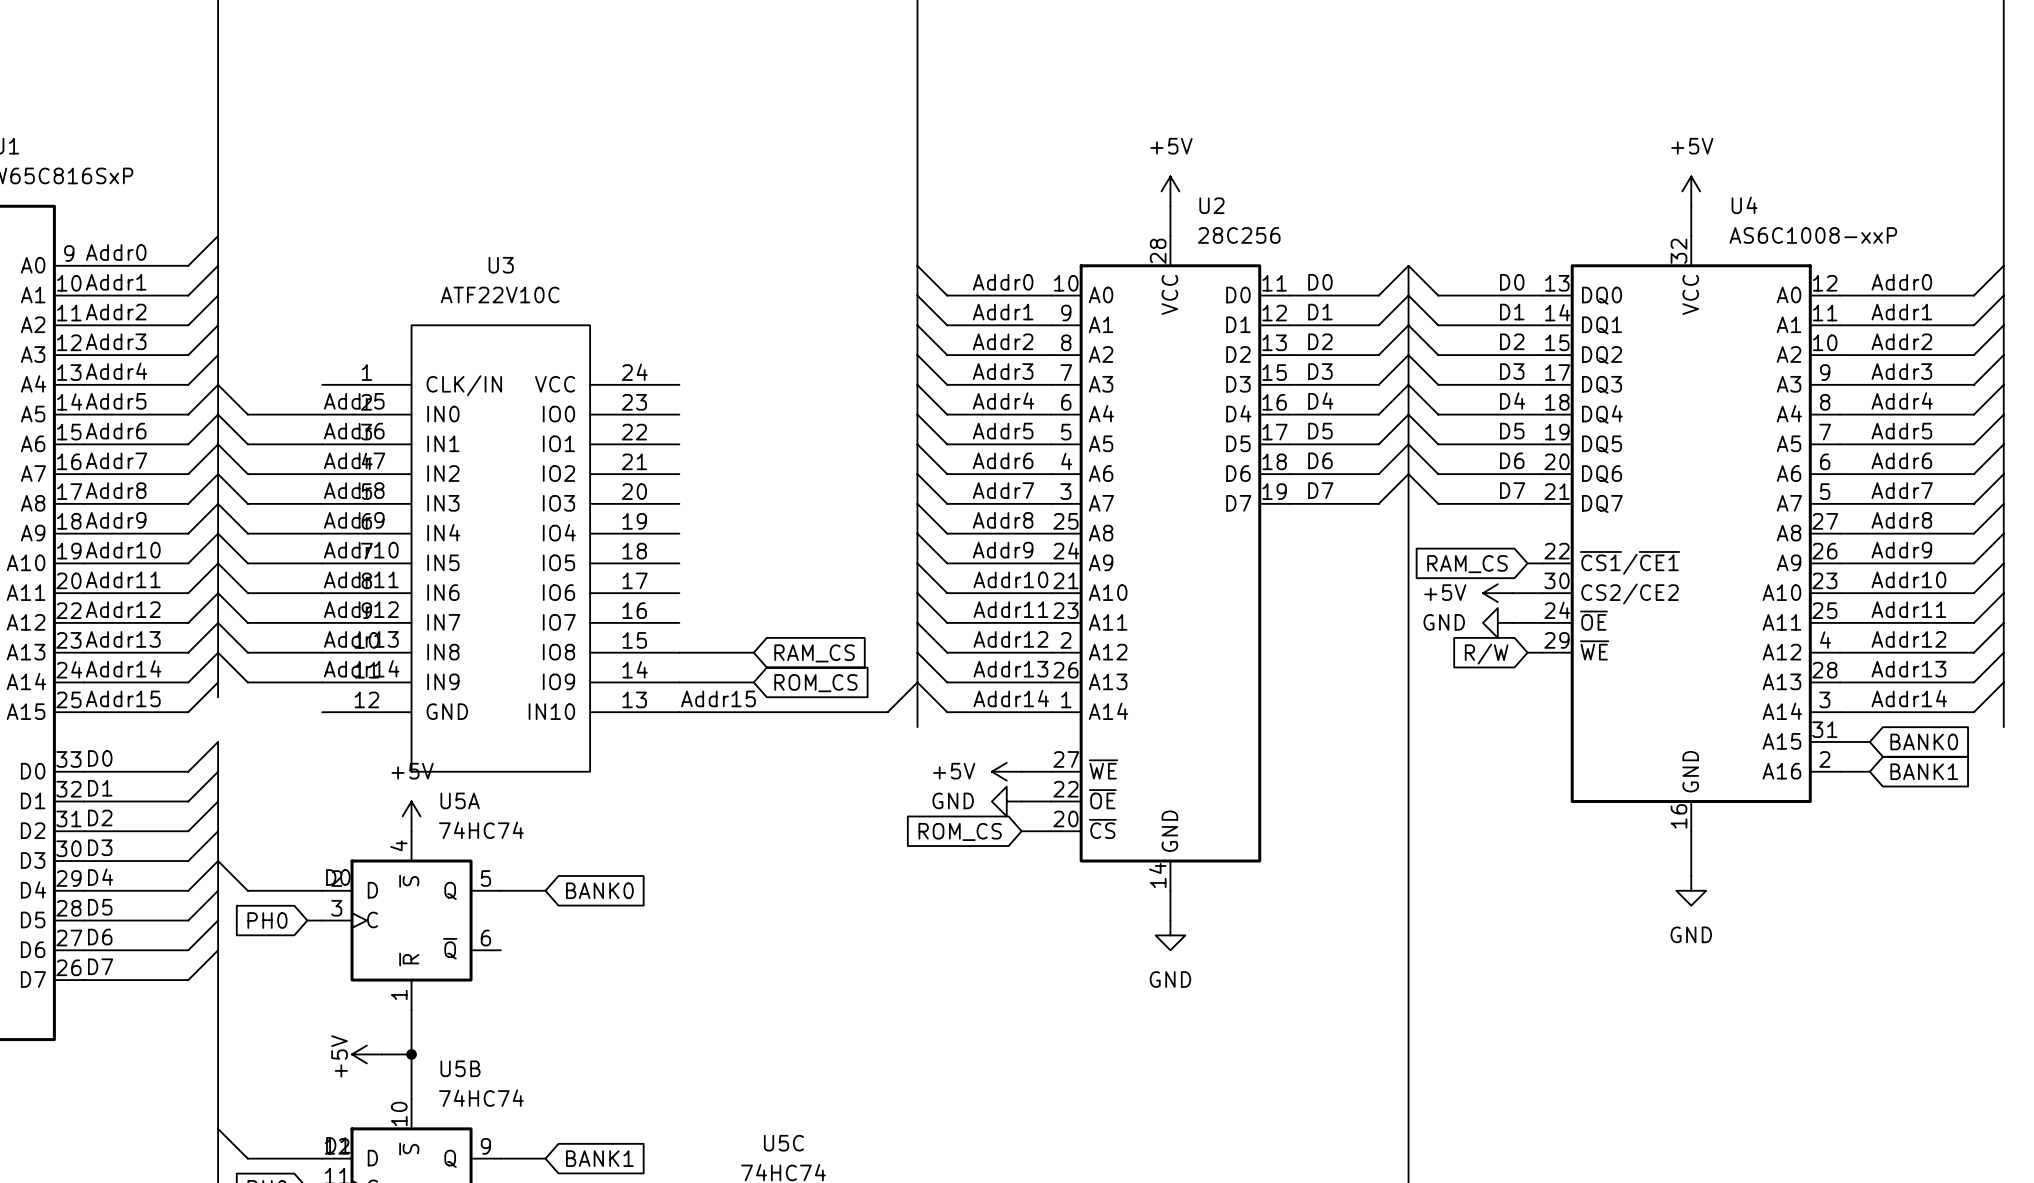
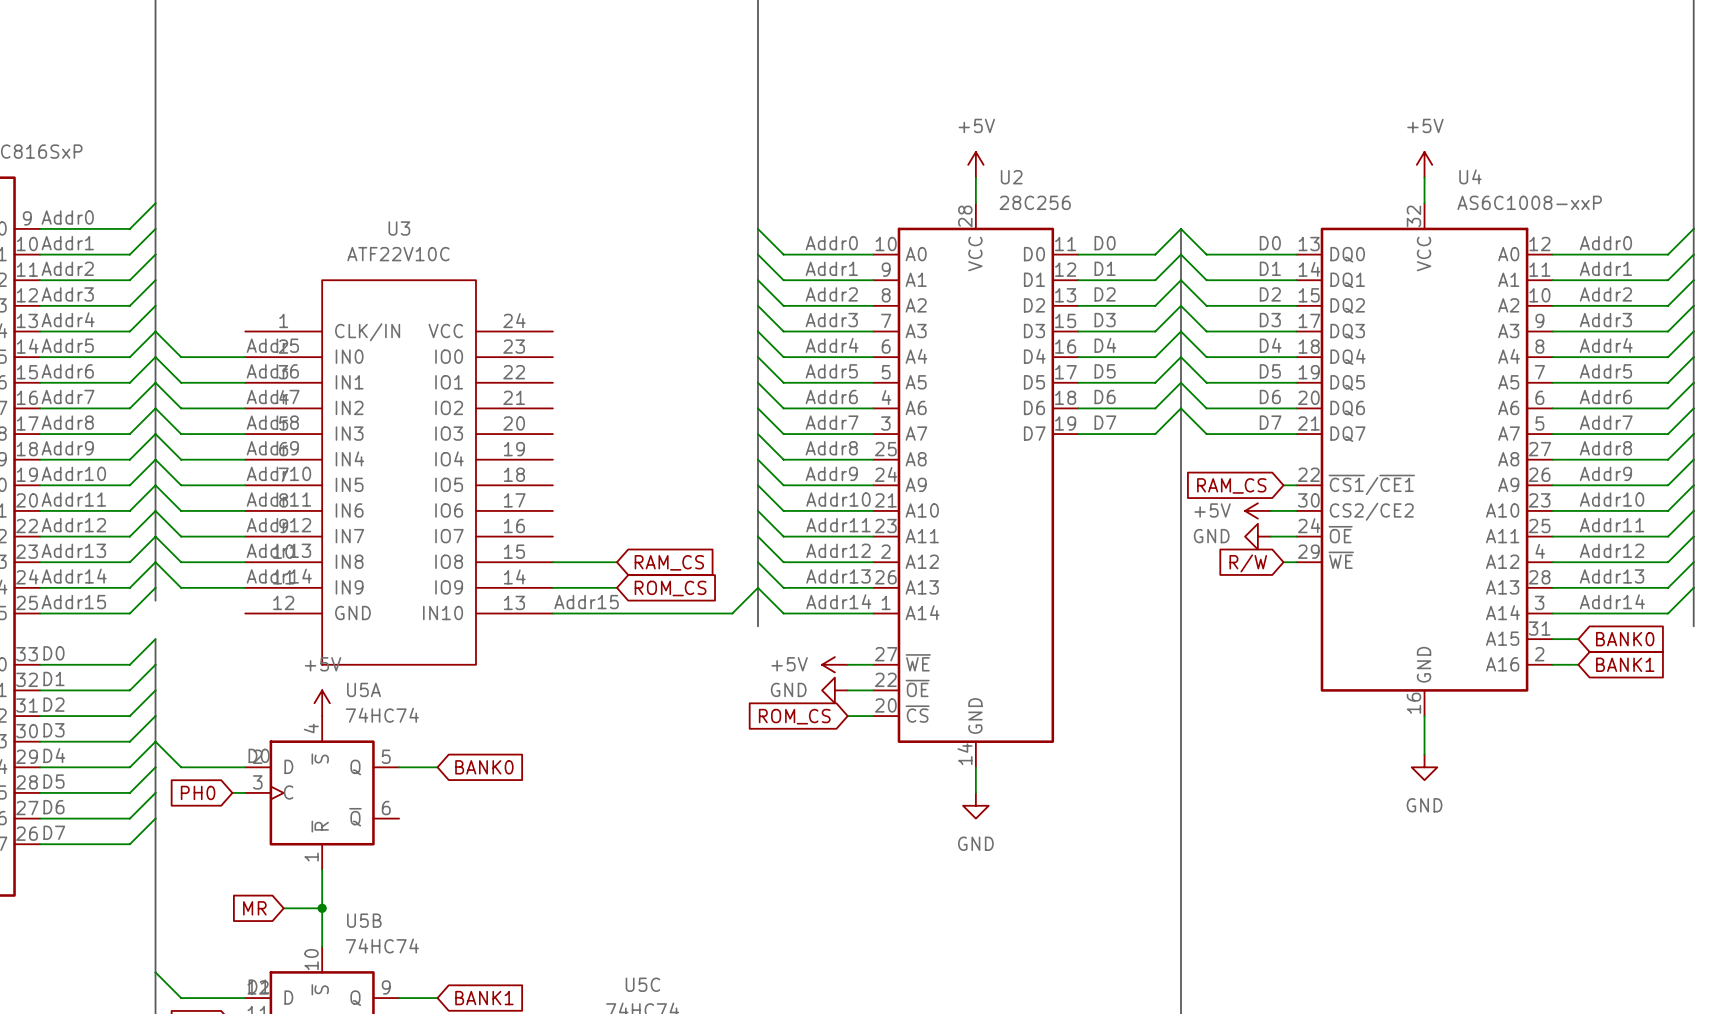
global label: none -> MR (254, 908)
power symbol: +5V (366, 1054) -> none

